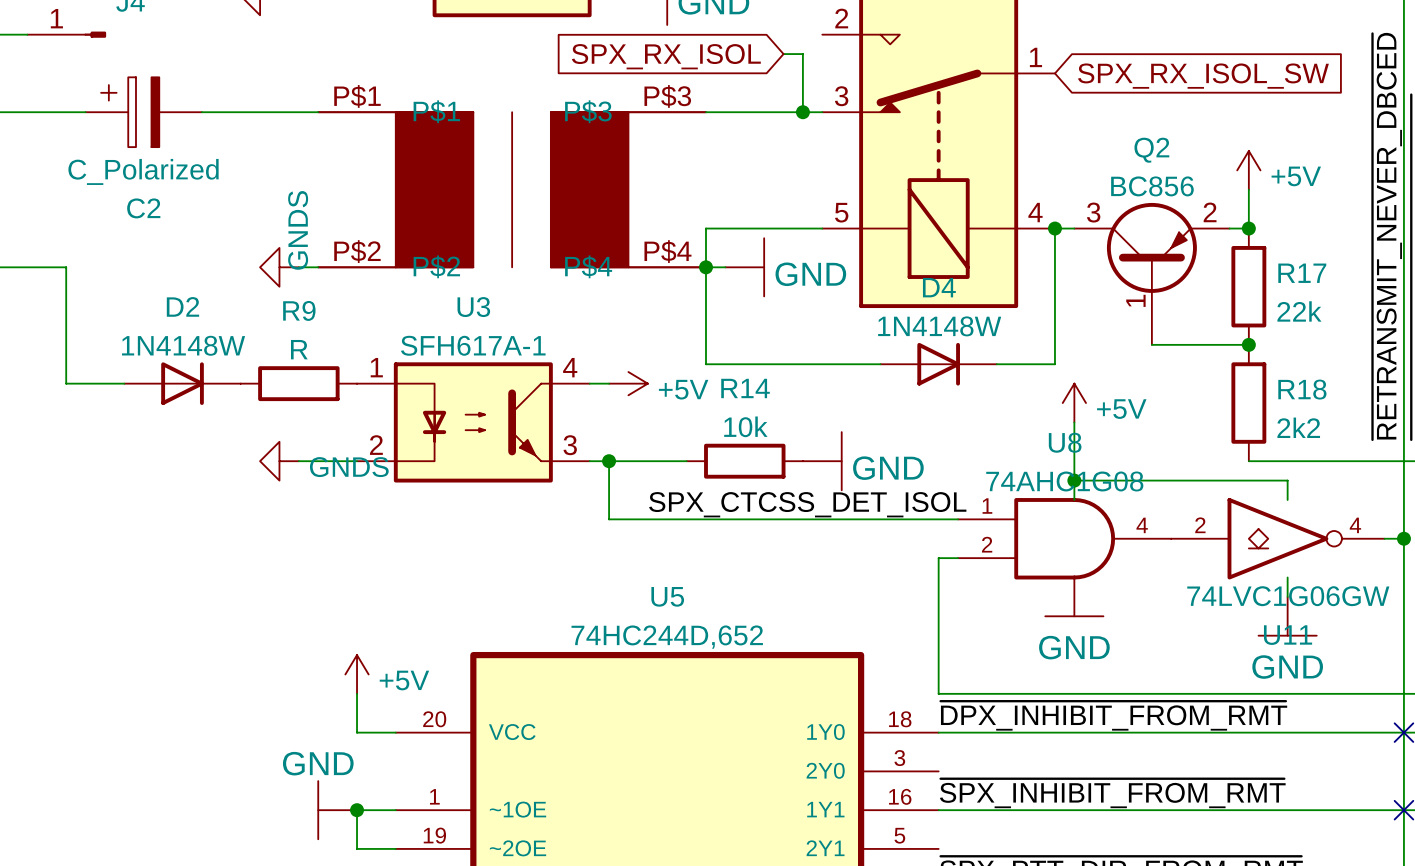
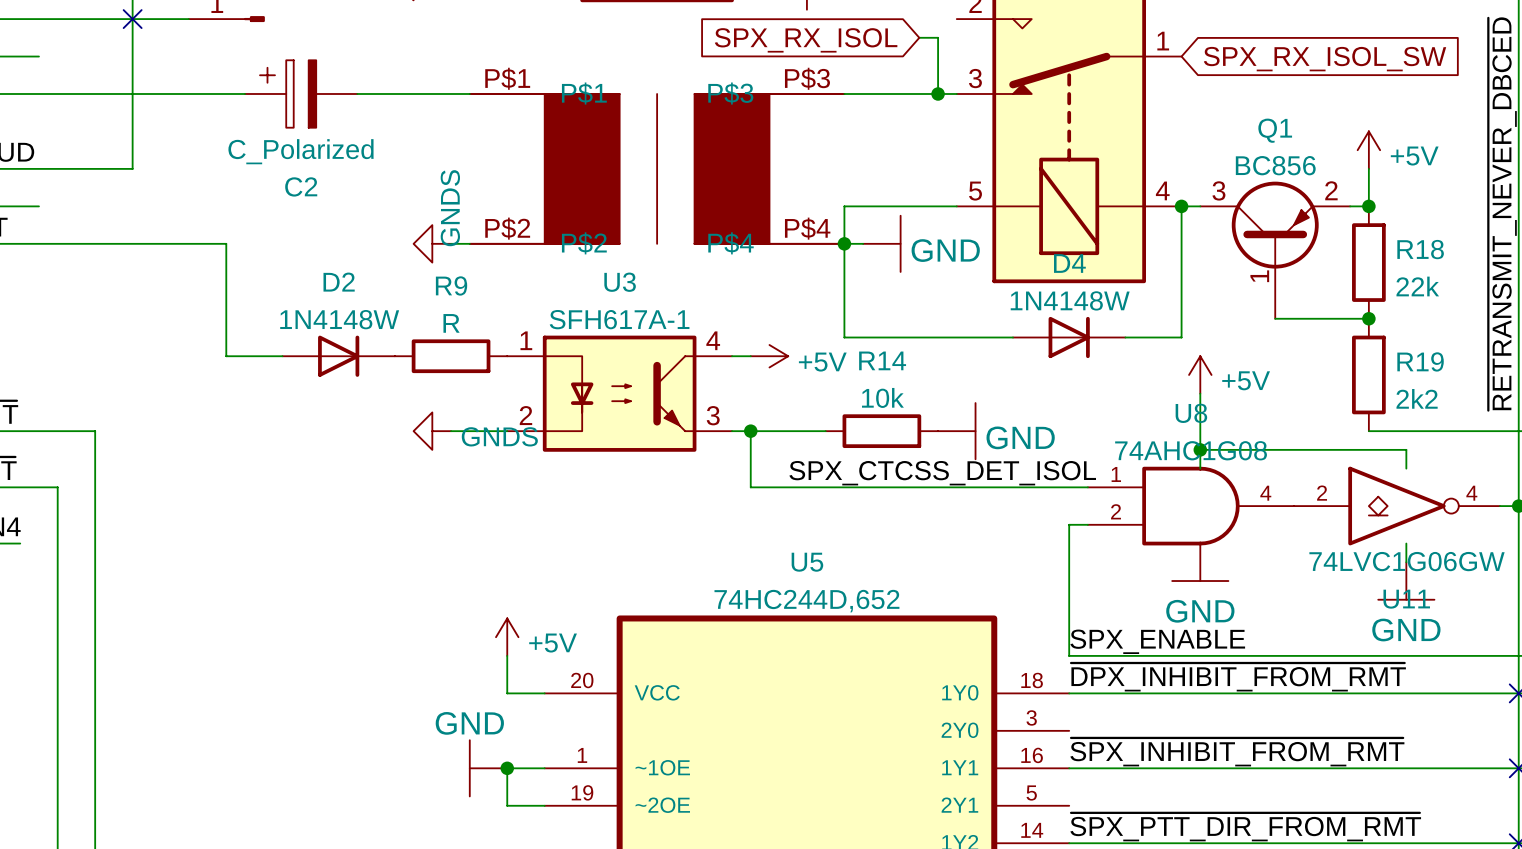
Q2 name: Q2 (1151, 150) -> Q1 (1275, 130)
R17 name: R17 (1302, 273) -> R18 (1420, 249)
R18 name: R18 (1302, 389) -> R19 (1420, 361)
label: none -> SPX_ENABLE (1157, 641)

